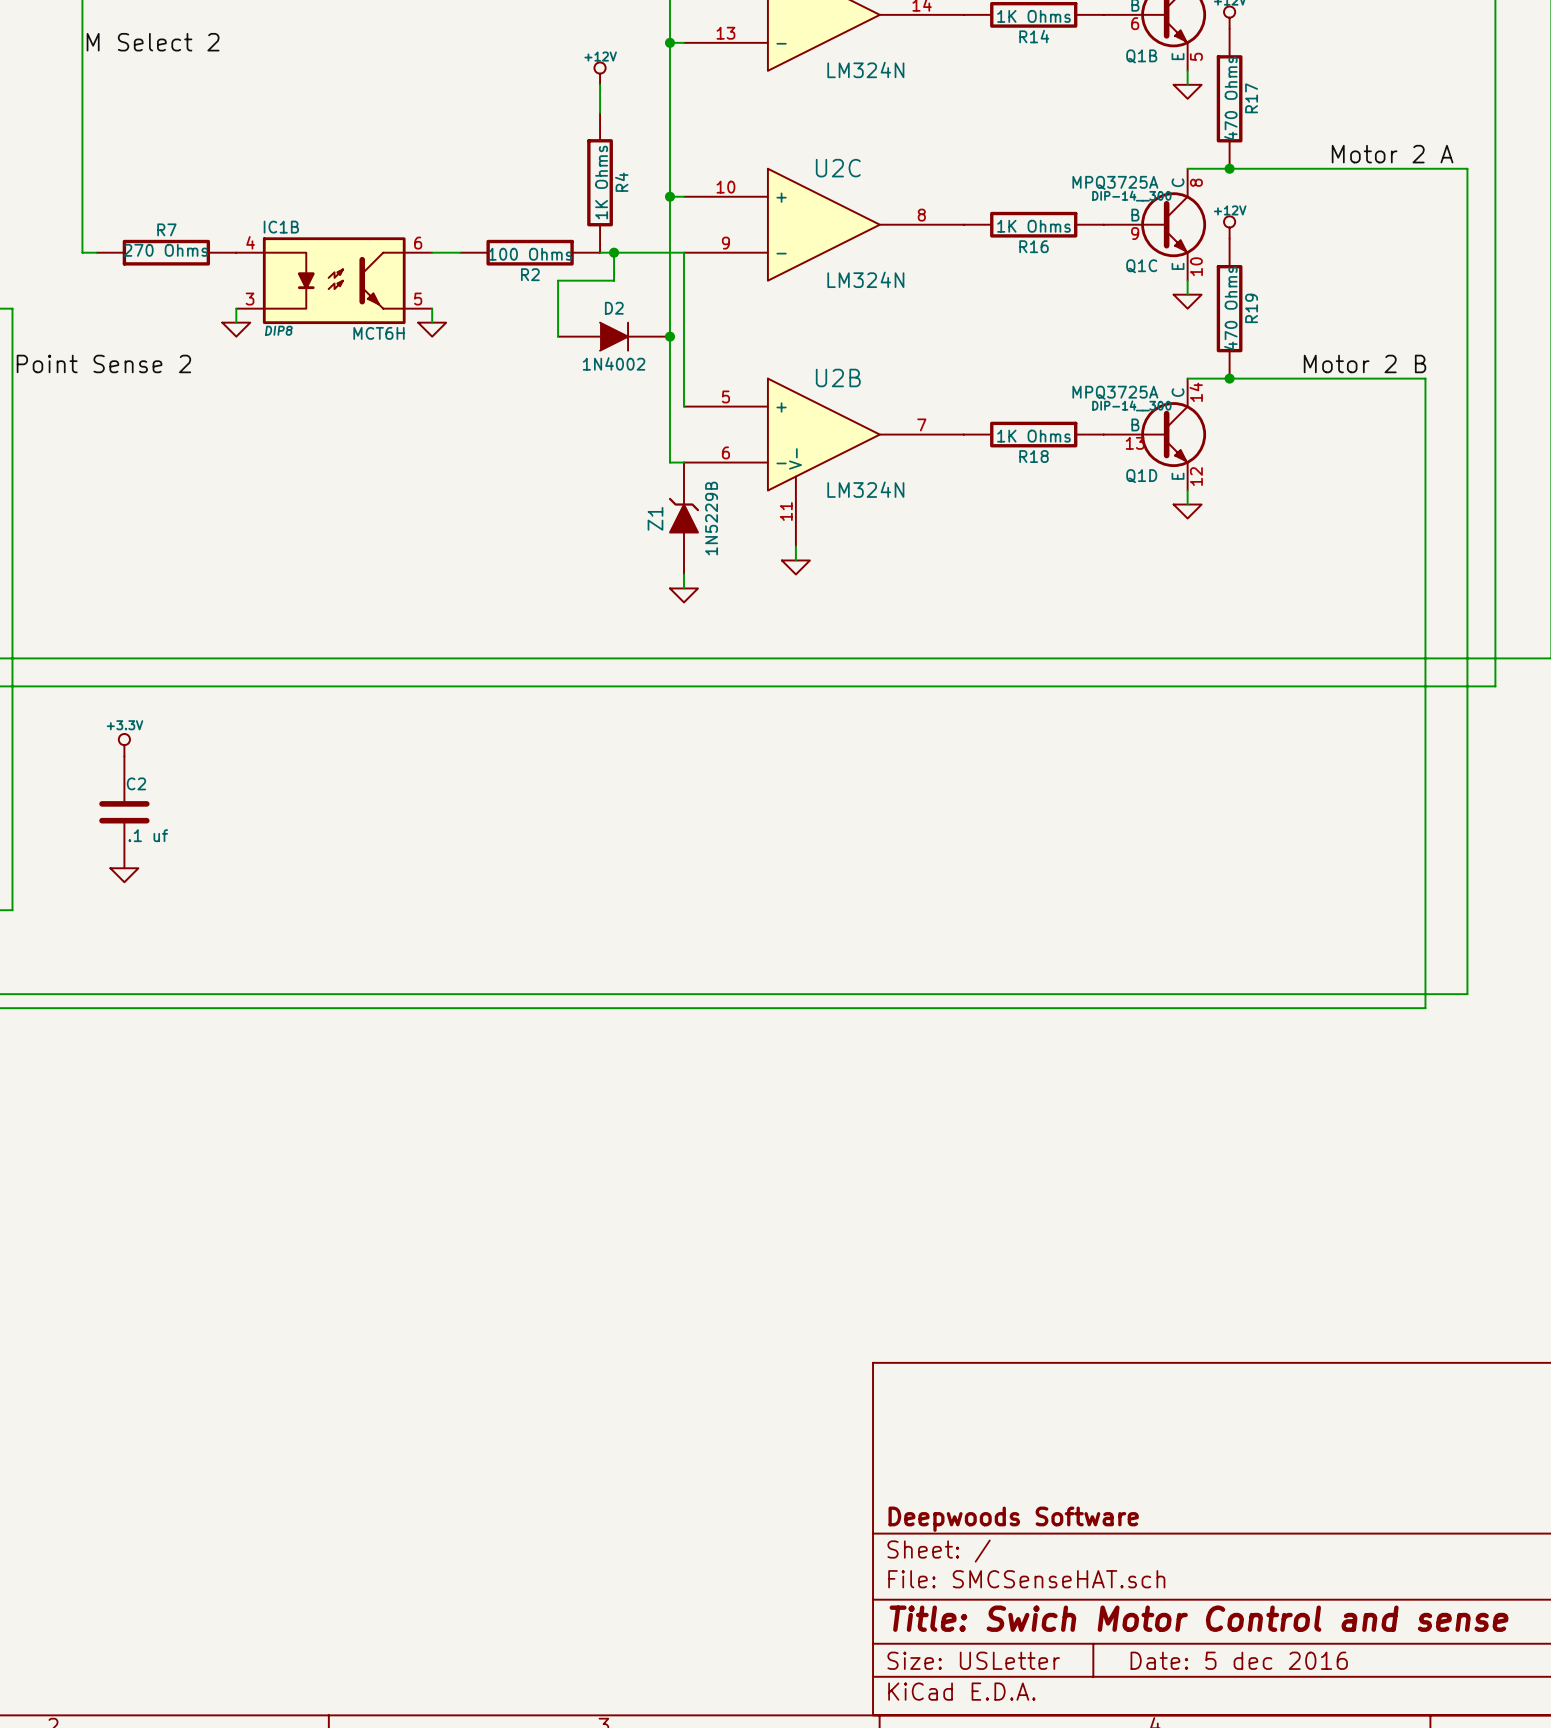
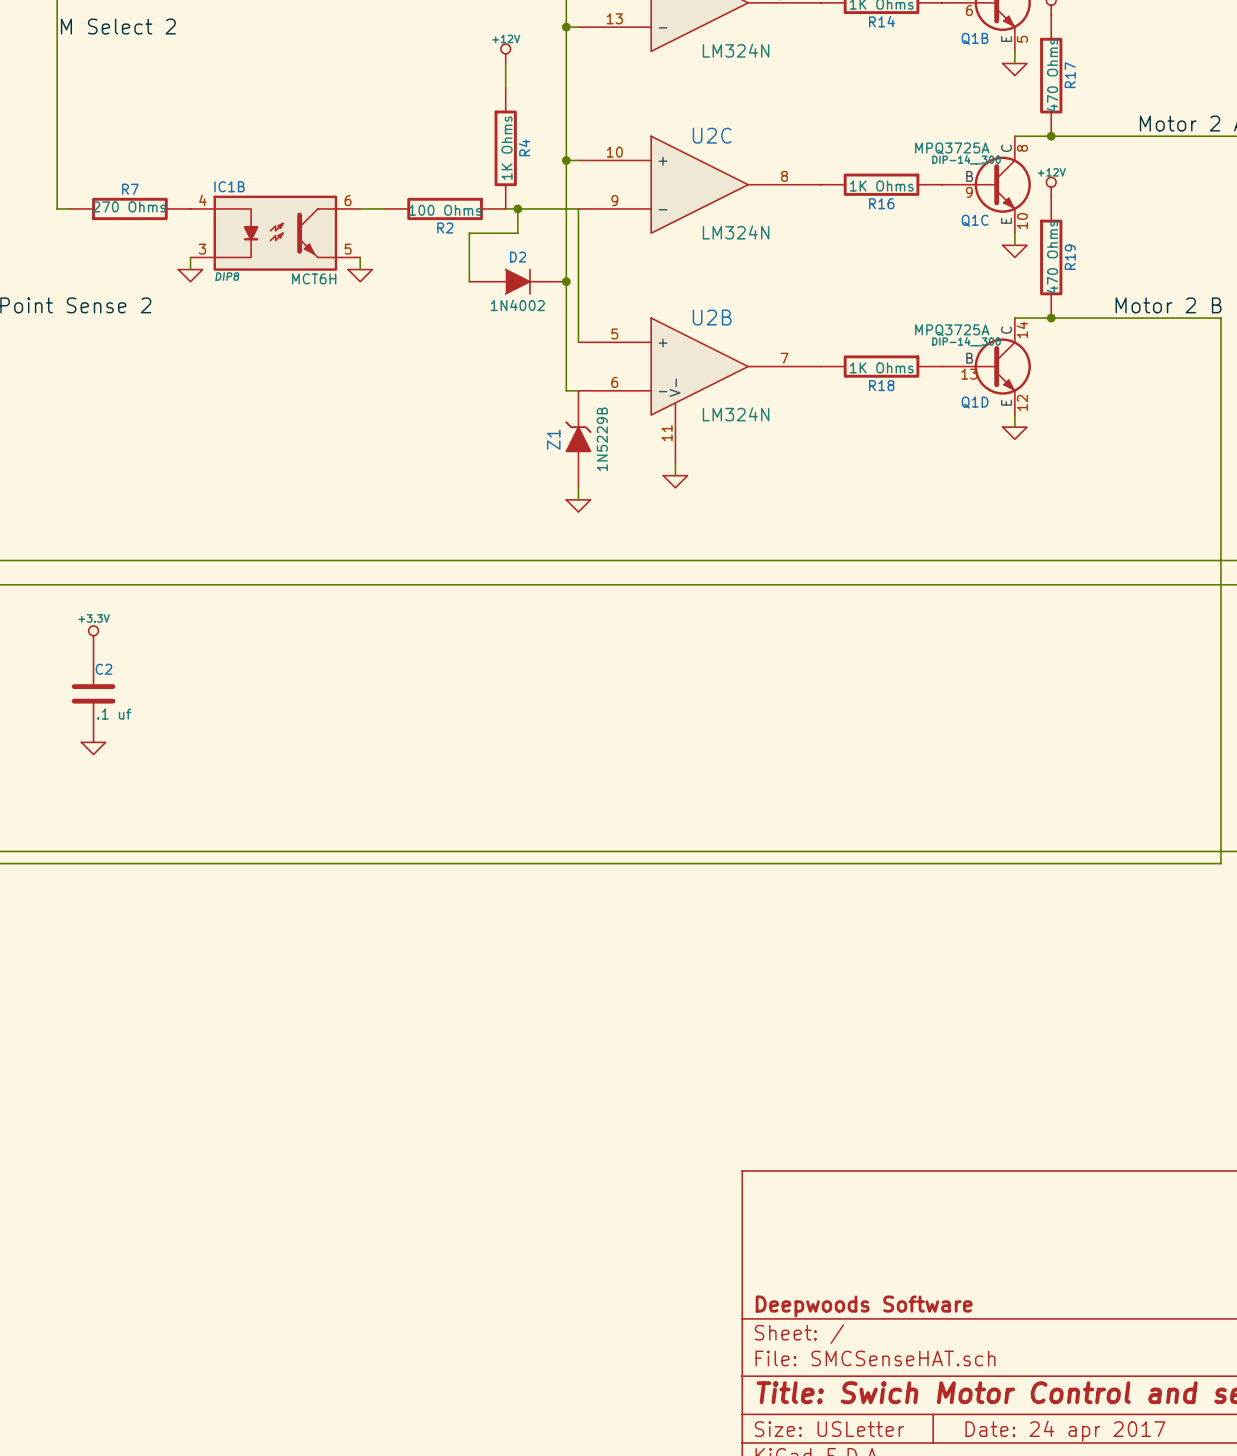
title block: Date: 5 dec 2016 (1239, 1660) -> Date: 24 apr 2017 (1065, 1431)

